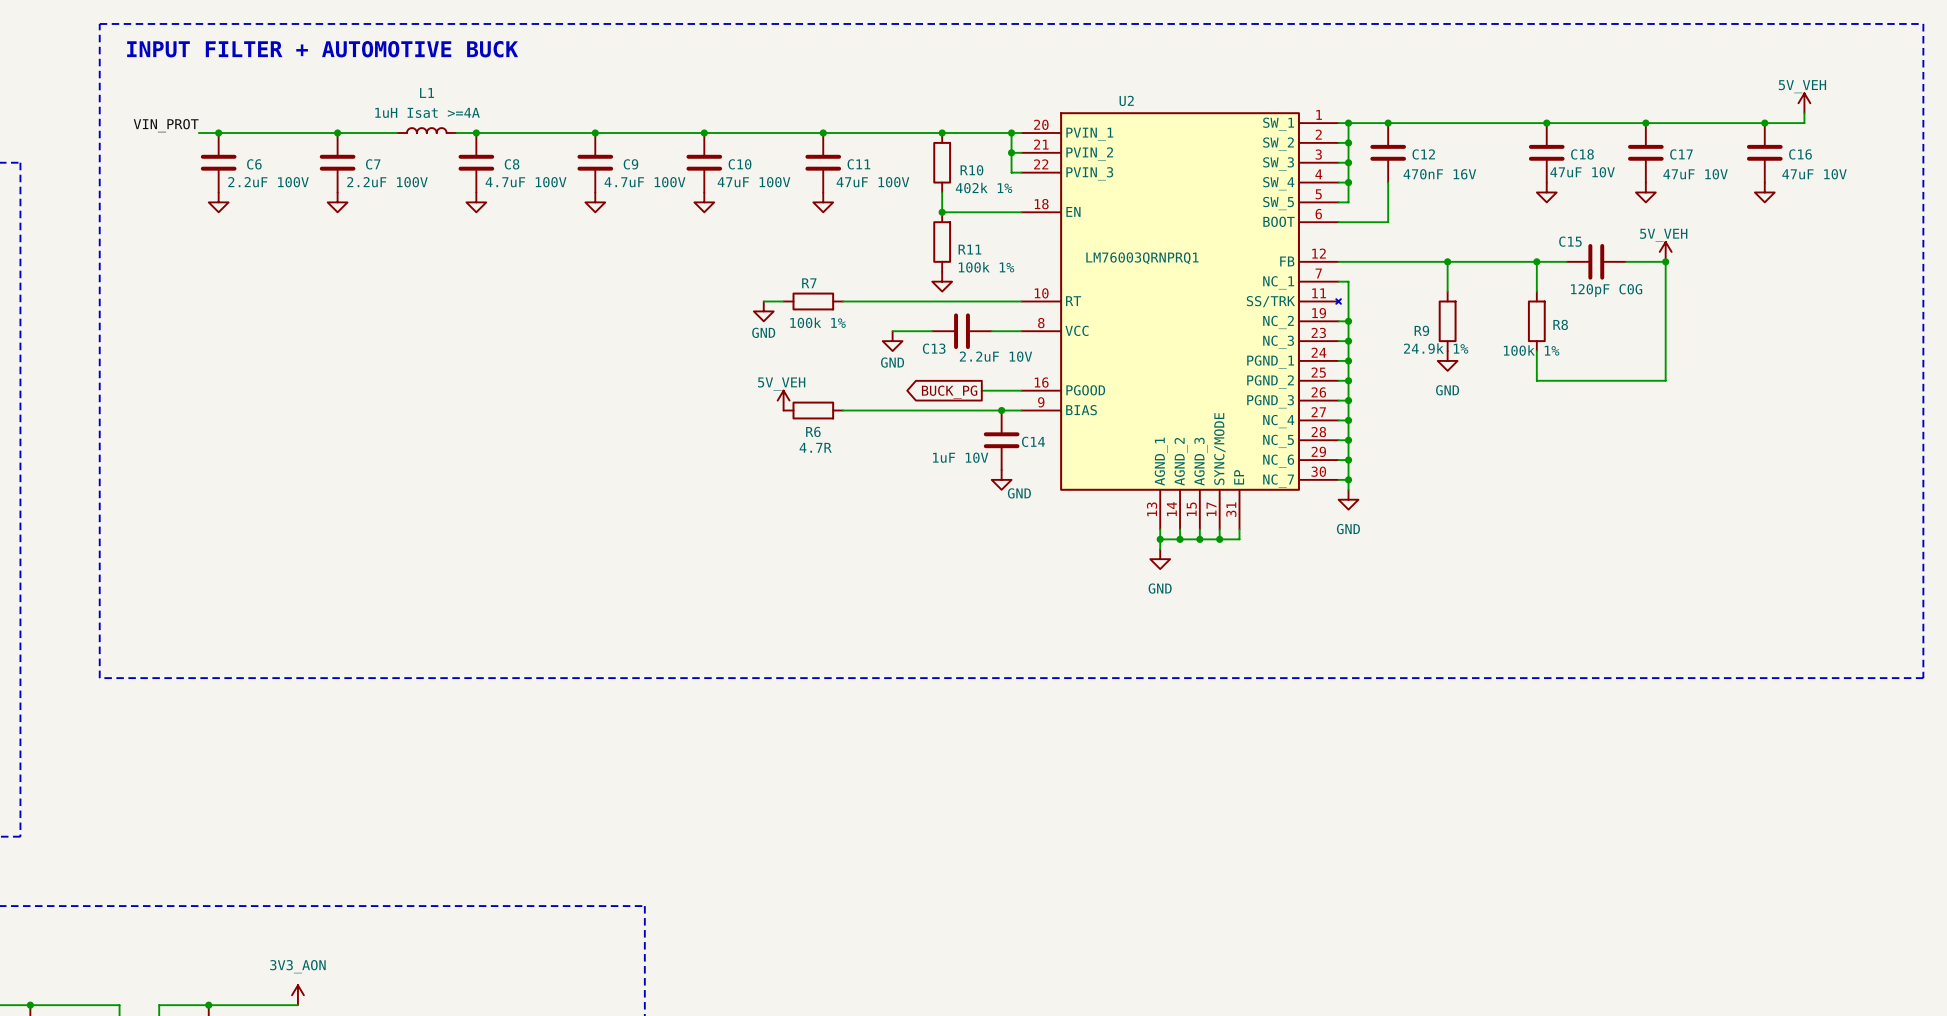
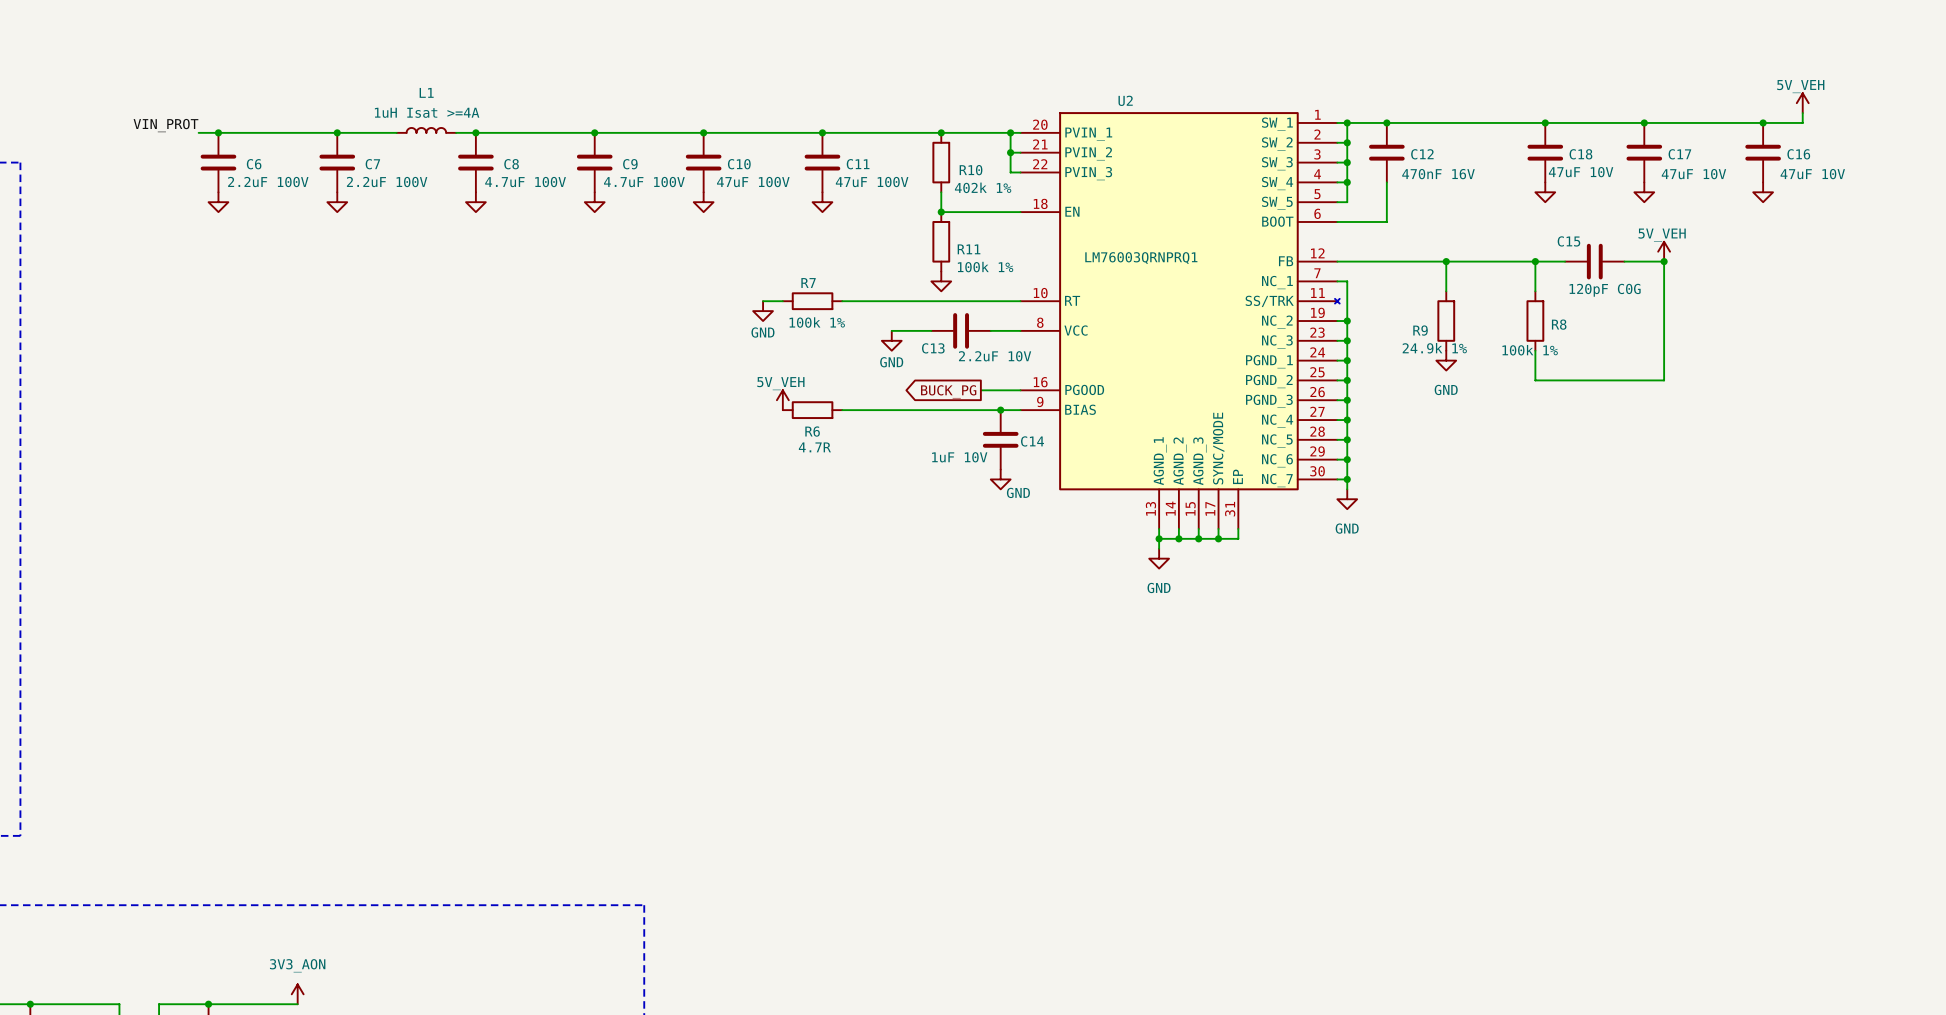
line: (99, 23) (1923, 23) (1923, 678) (99, 678) (99, 23) -> none
text: INPUT FILTER + AUTOMOTIVE BUCK (322, 49) -> none

